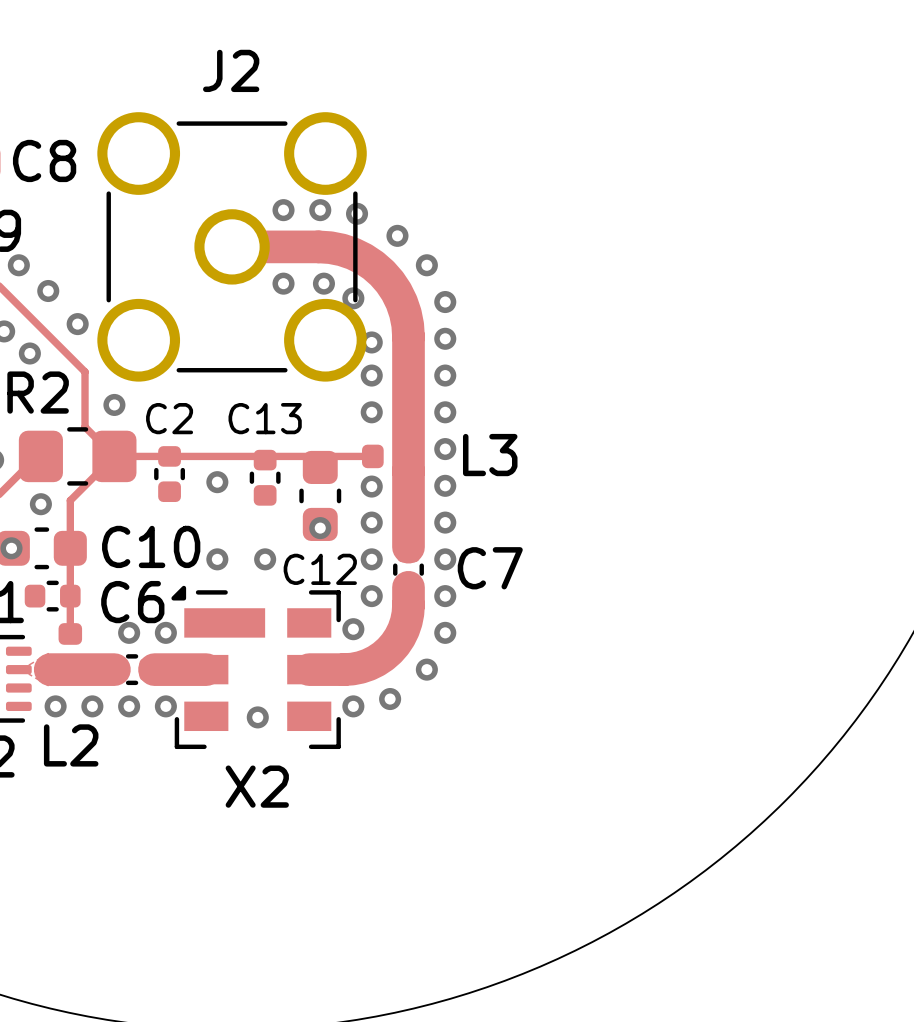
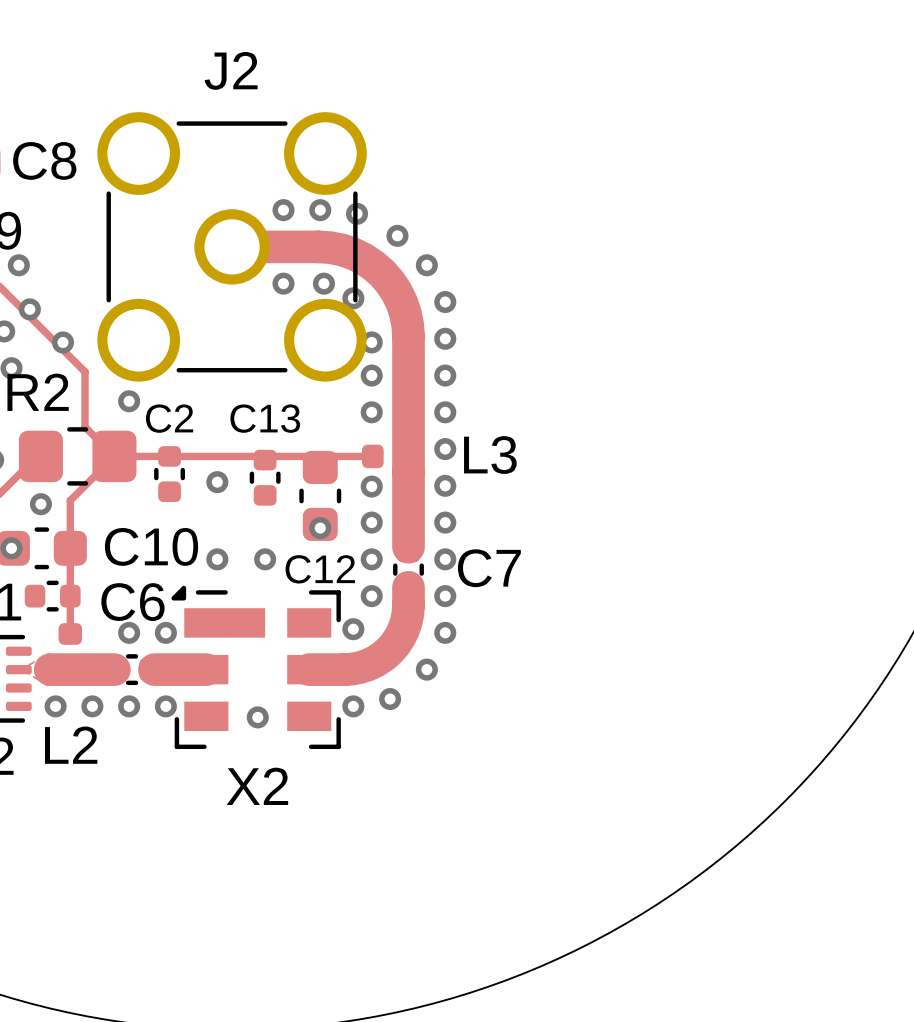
via position: (48, 291) -> (29, 309)
via position: (77, 324) -> (62, 342)
via position: (29, 353) -> (11, 368)
via position: (114, 404) -> (129, 401)

